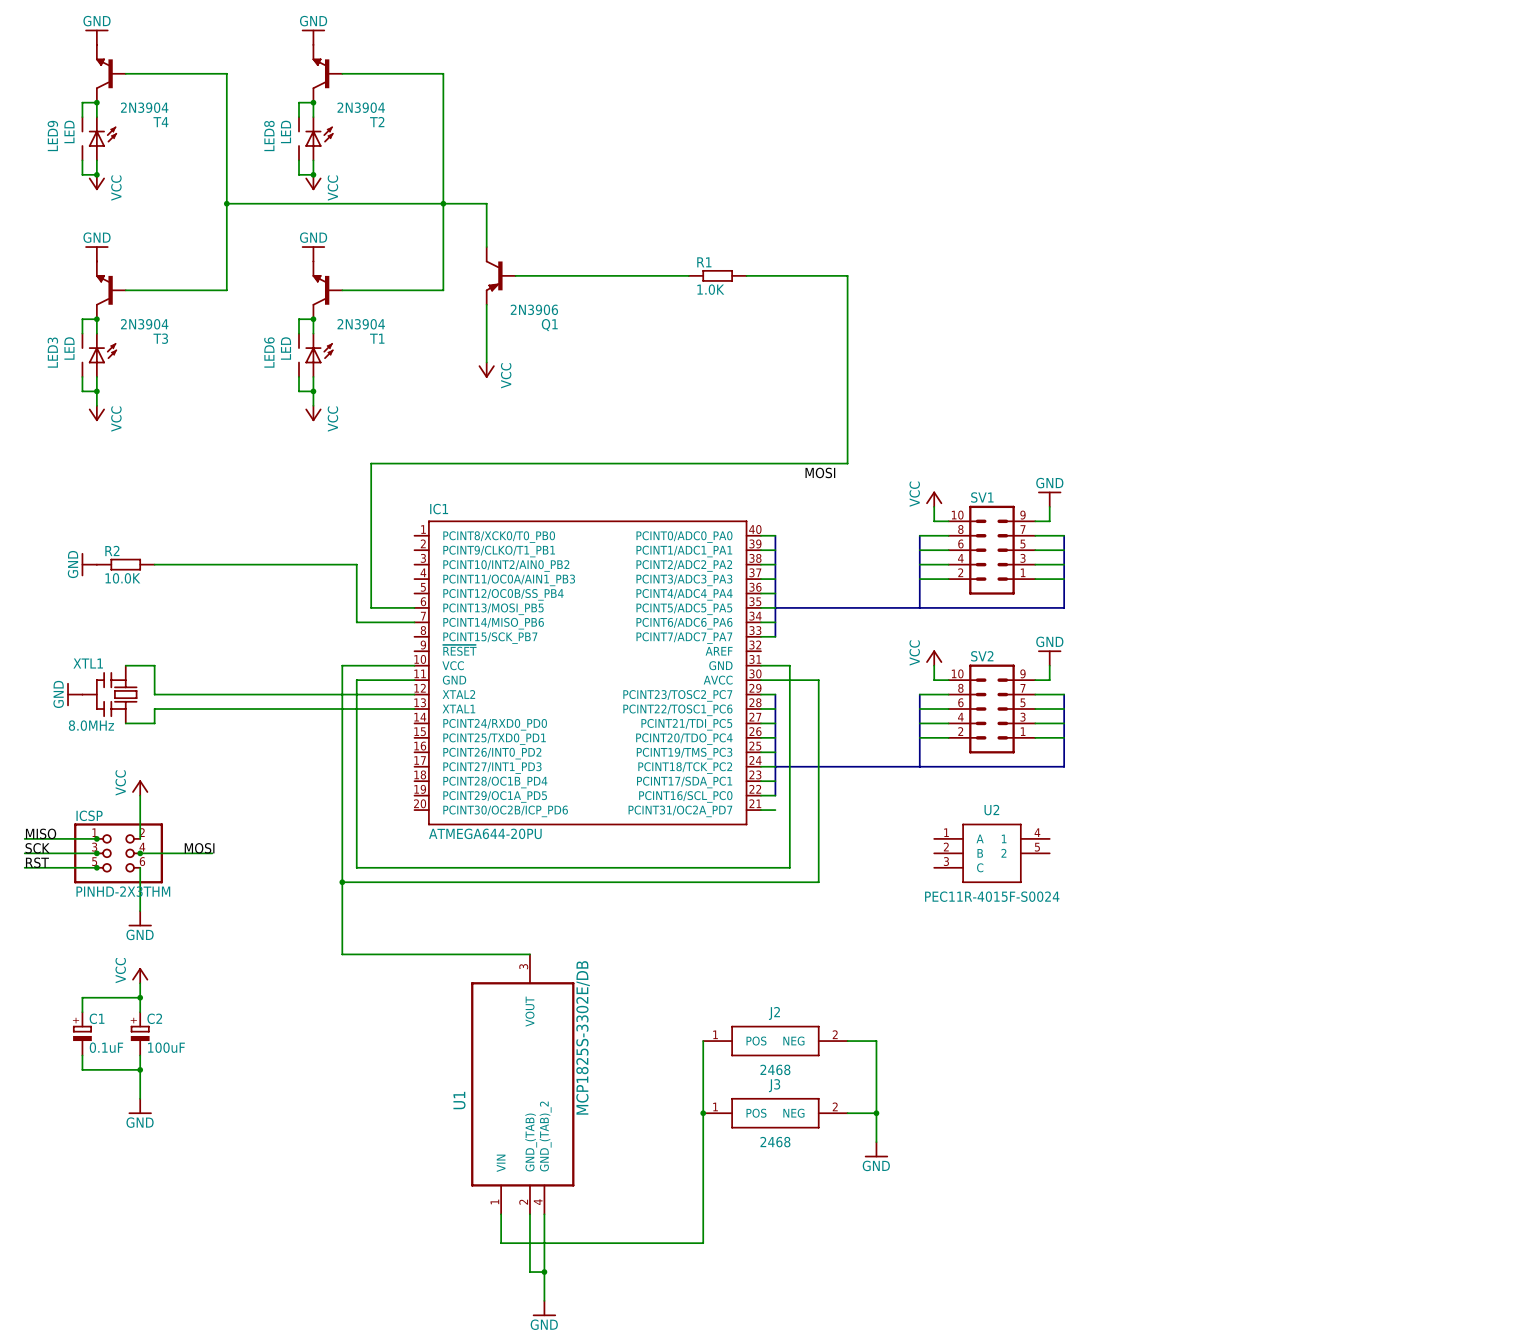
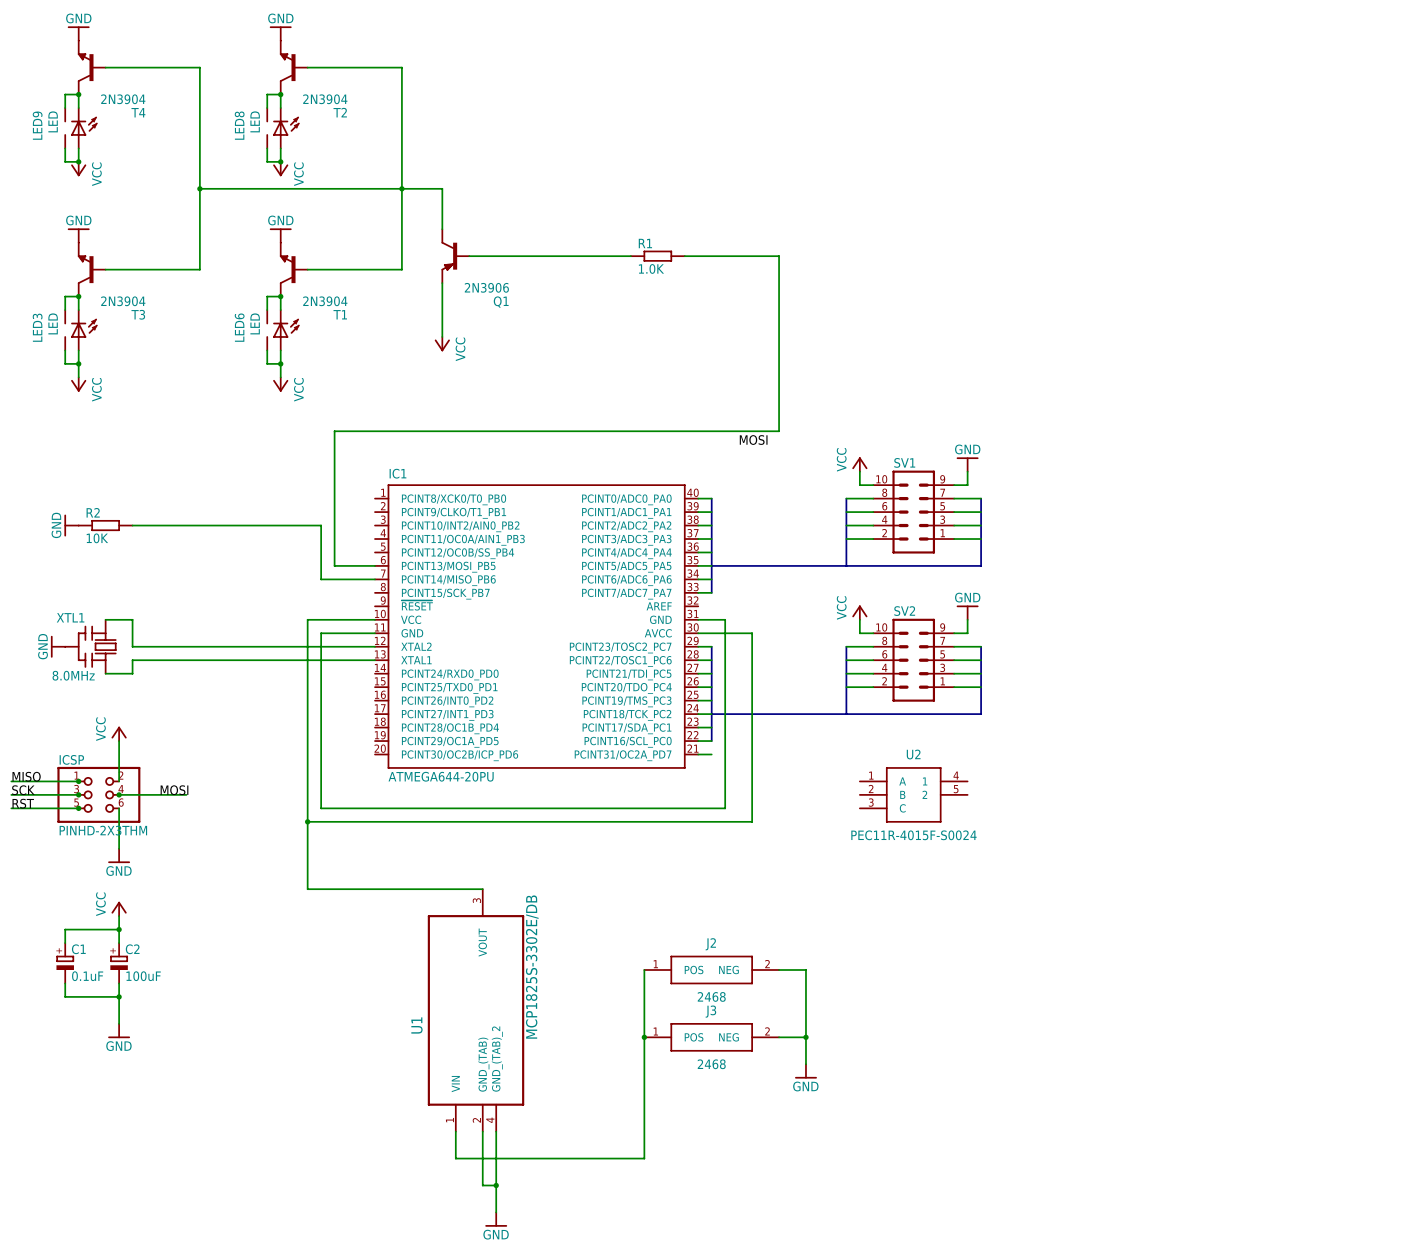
R2 value: 10.0K (122, 578) -> 10K (97, 538)

